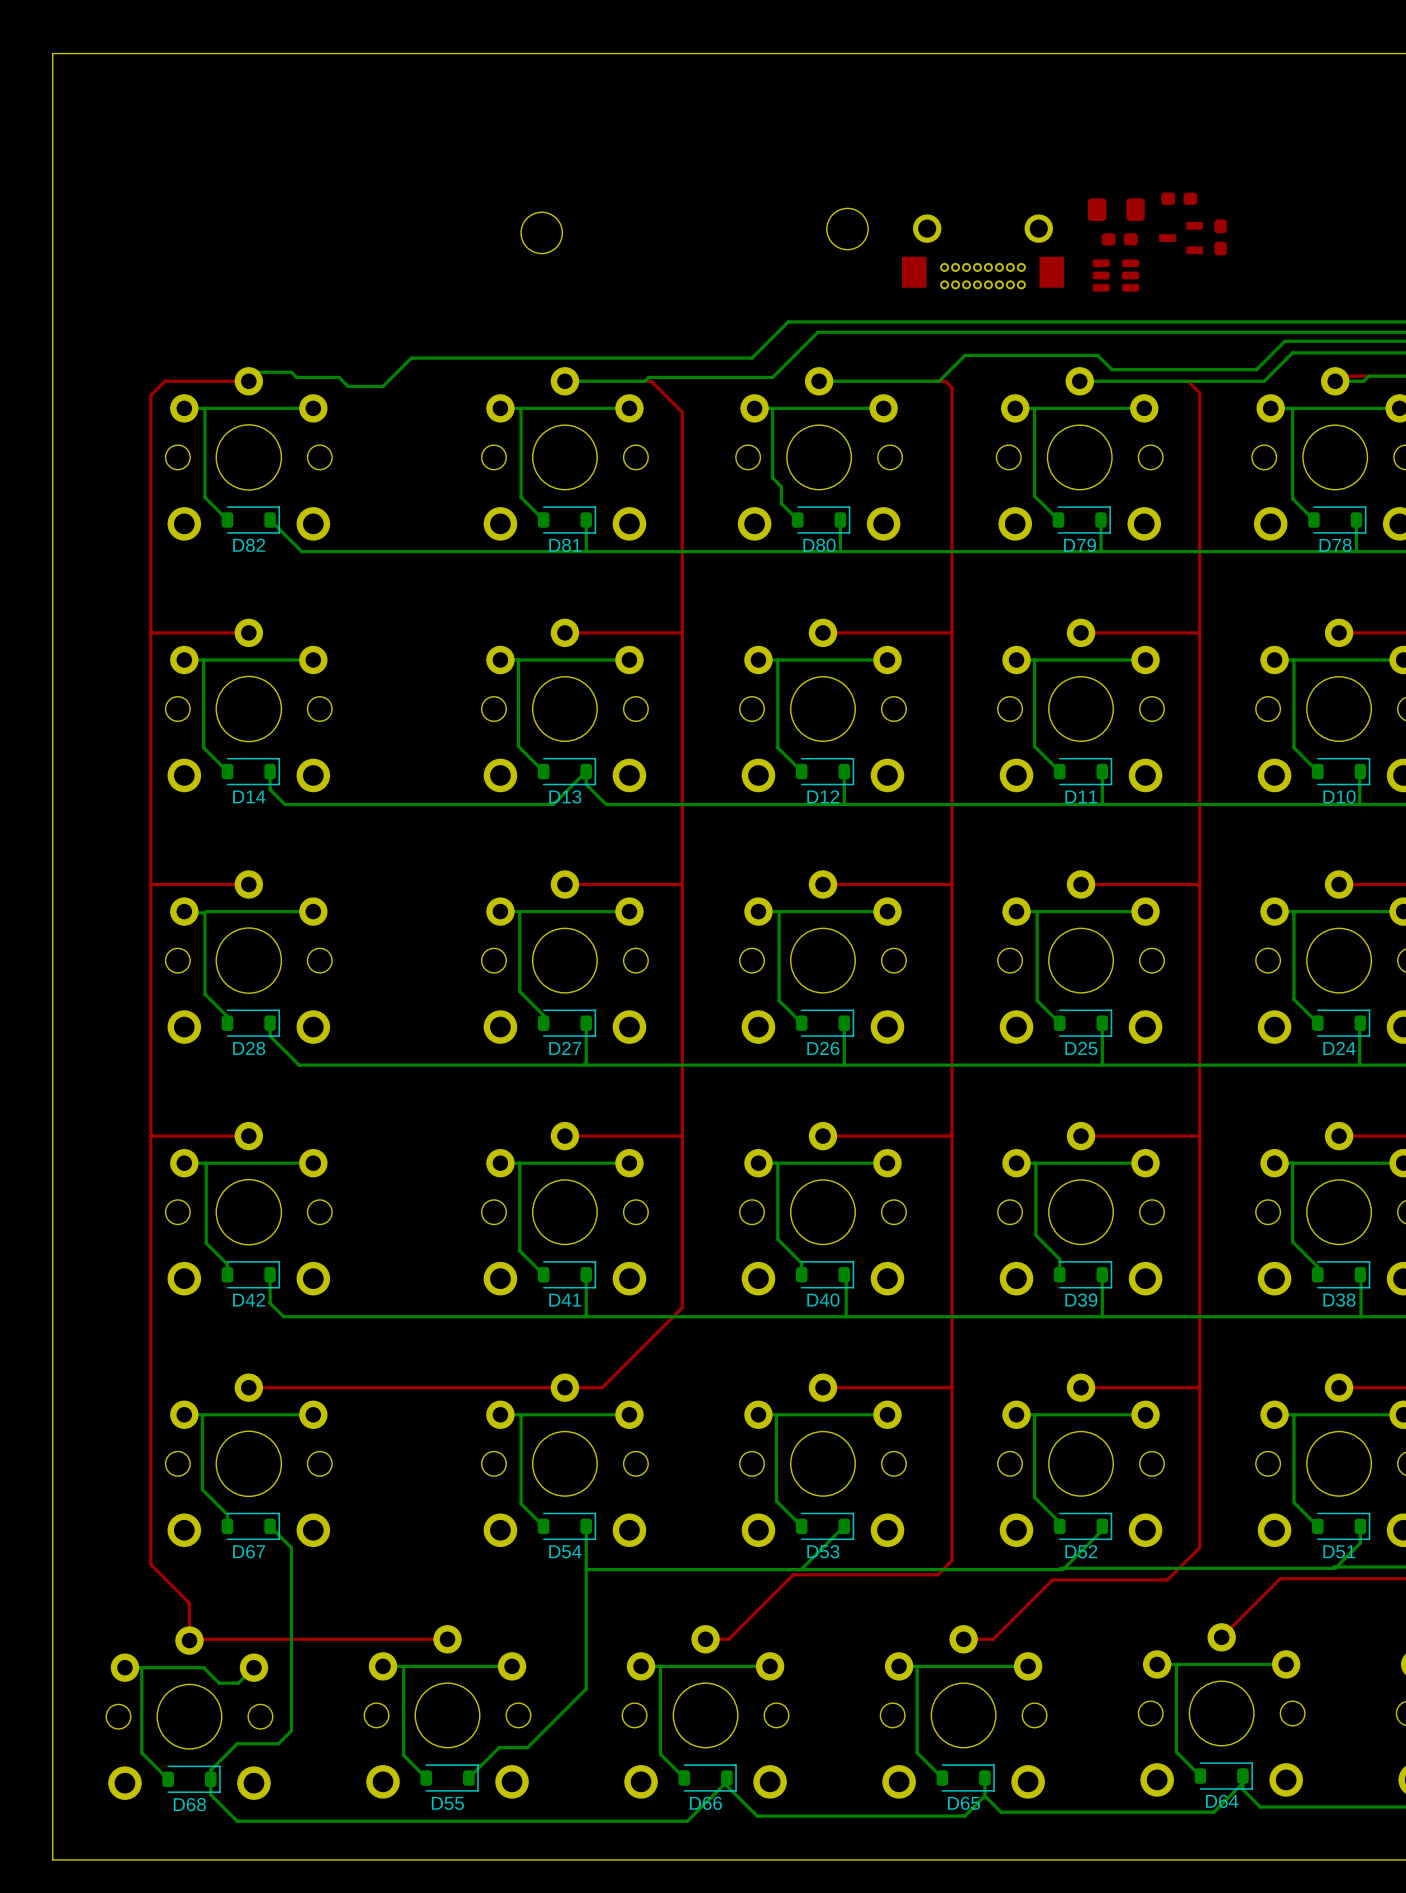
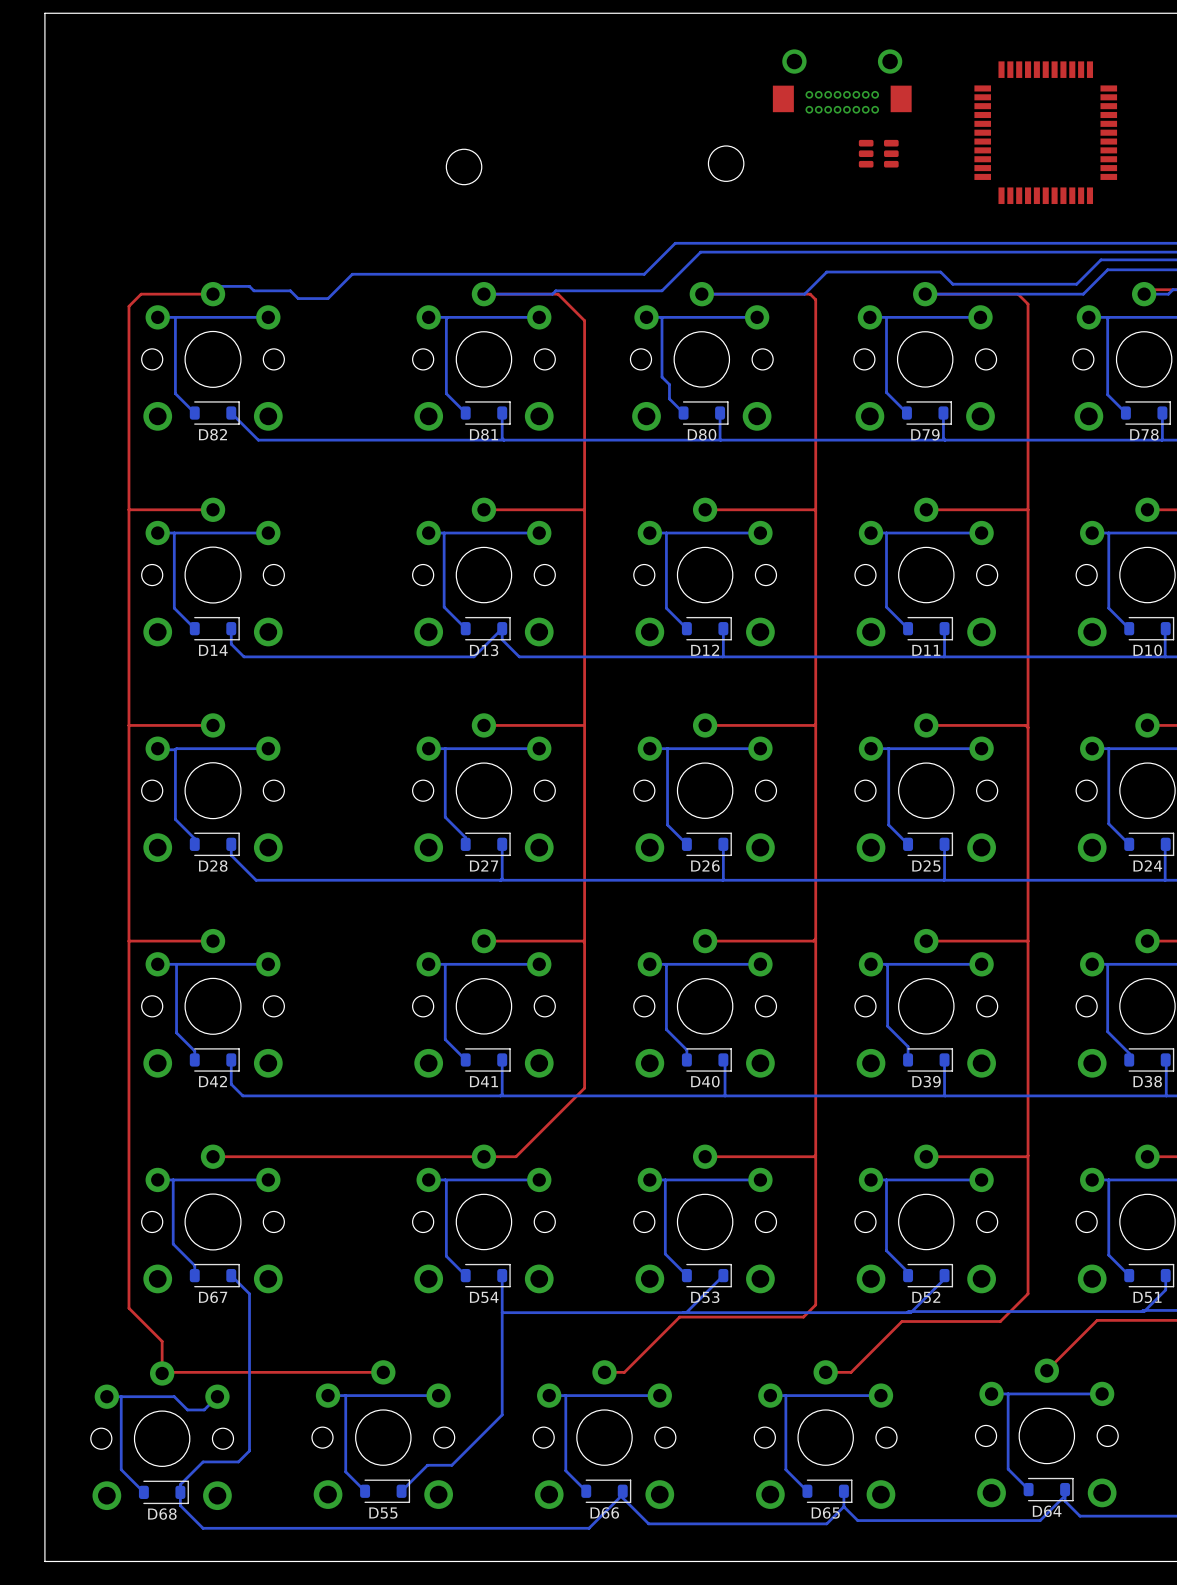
part: none -> (1045, 132)
part: (1179, 198) -> none
part: (1116, 209) -> none
part: (1220, 237) -> none
part: (1181, 238) -> none
part: (1119, 239) -> none
part position: (982, 251) -> (842, 81)
part position: (1115, 275) -> (878, 153)

